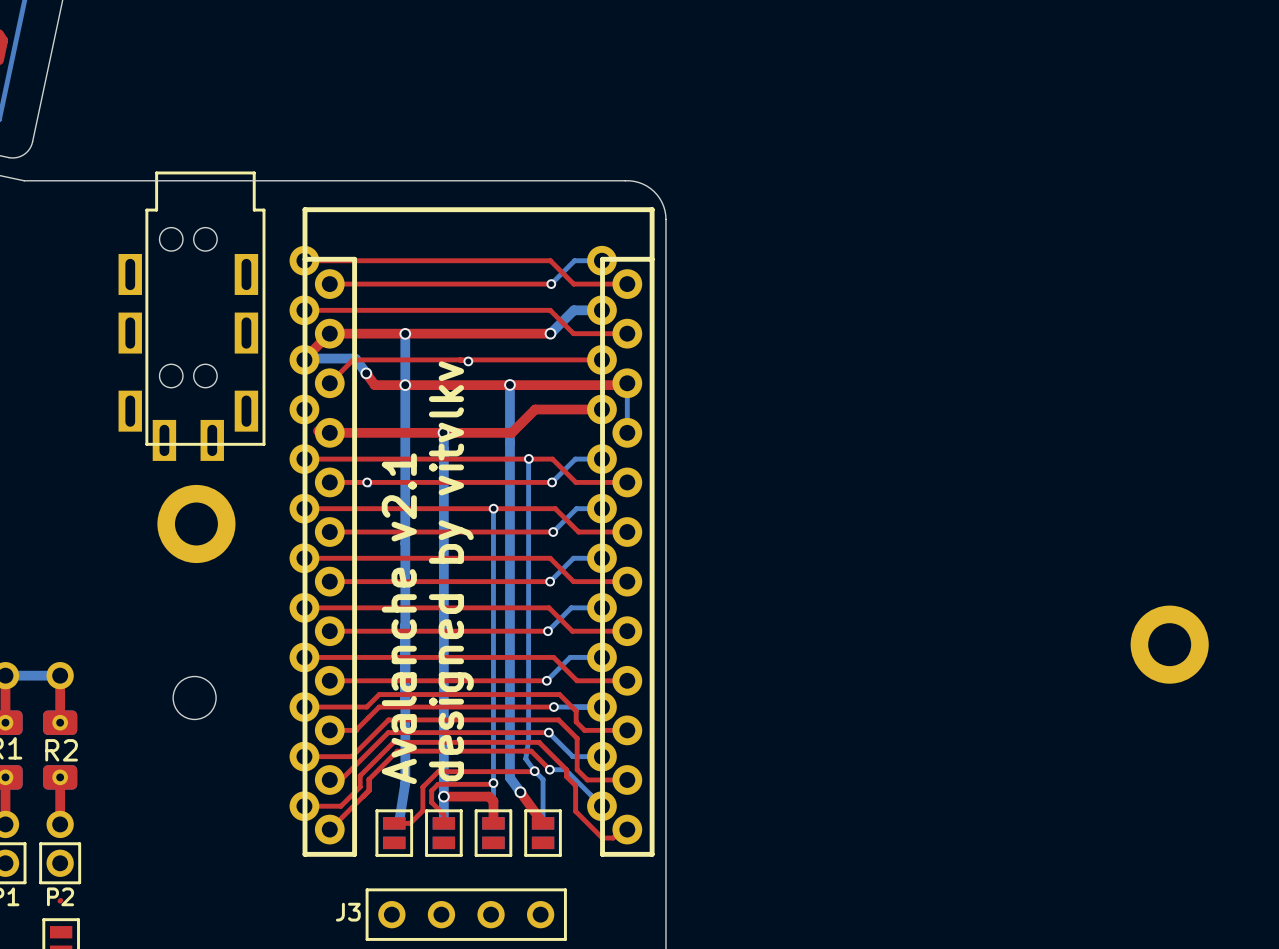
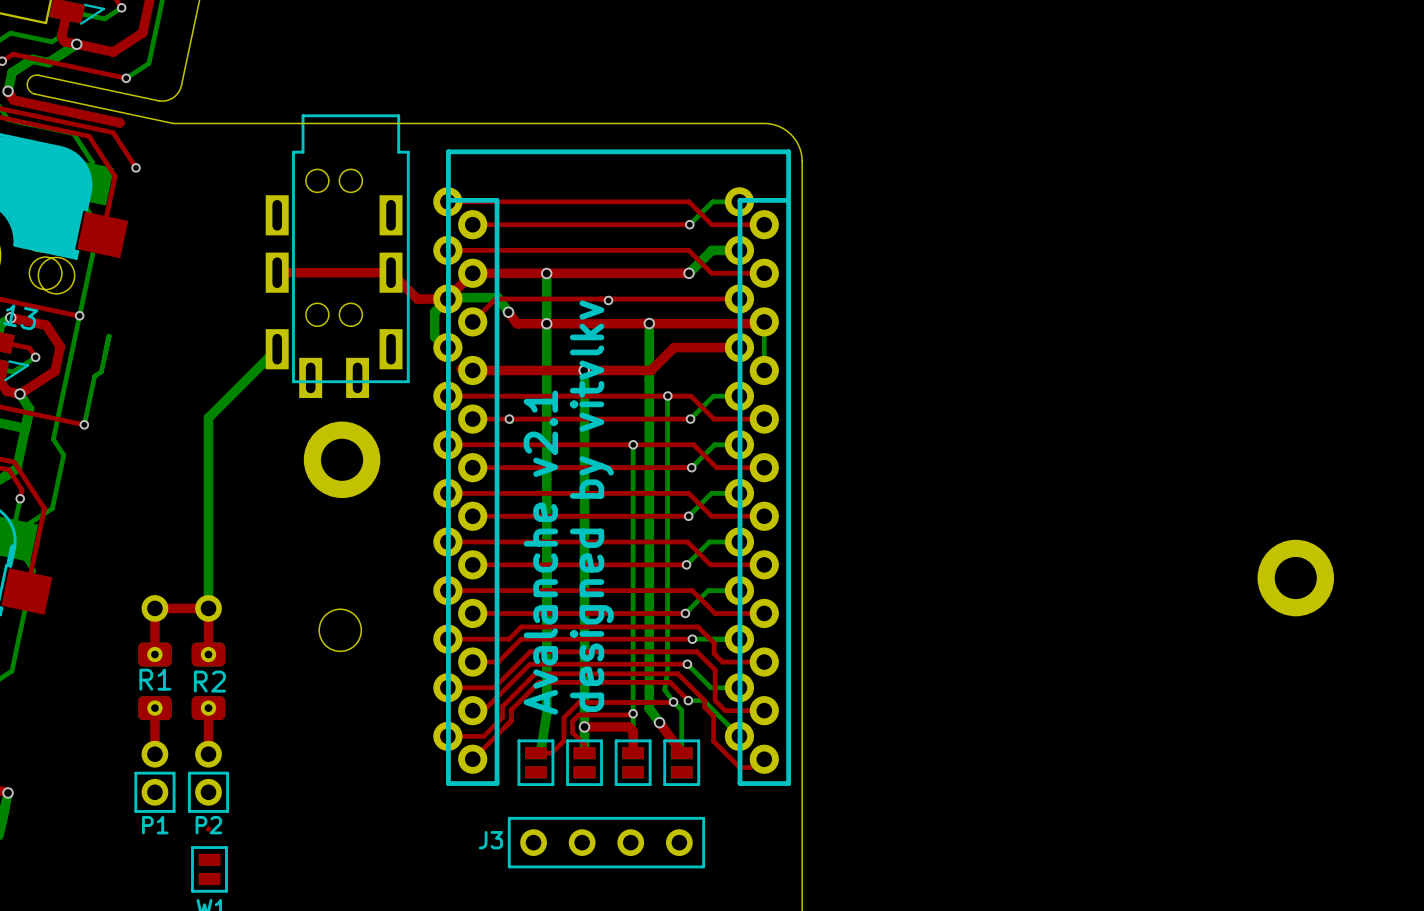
top track: none -> (277, 272) (391, 272) (417, 299) (447, 299)
bottom track: none -> (447, 299) (434, 312) (434, 336) (445, 347) (447, 347)
top track: none -> (154, 608) (208, 608)
bottom track: (5, 675) (60, 675) -> (277, 349) (208, 417) (208, 608)

